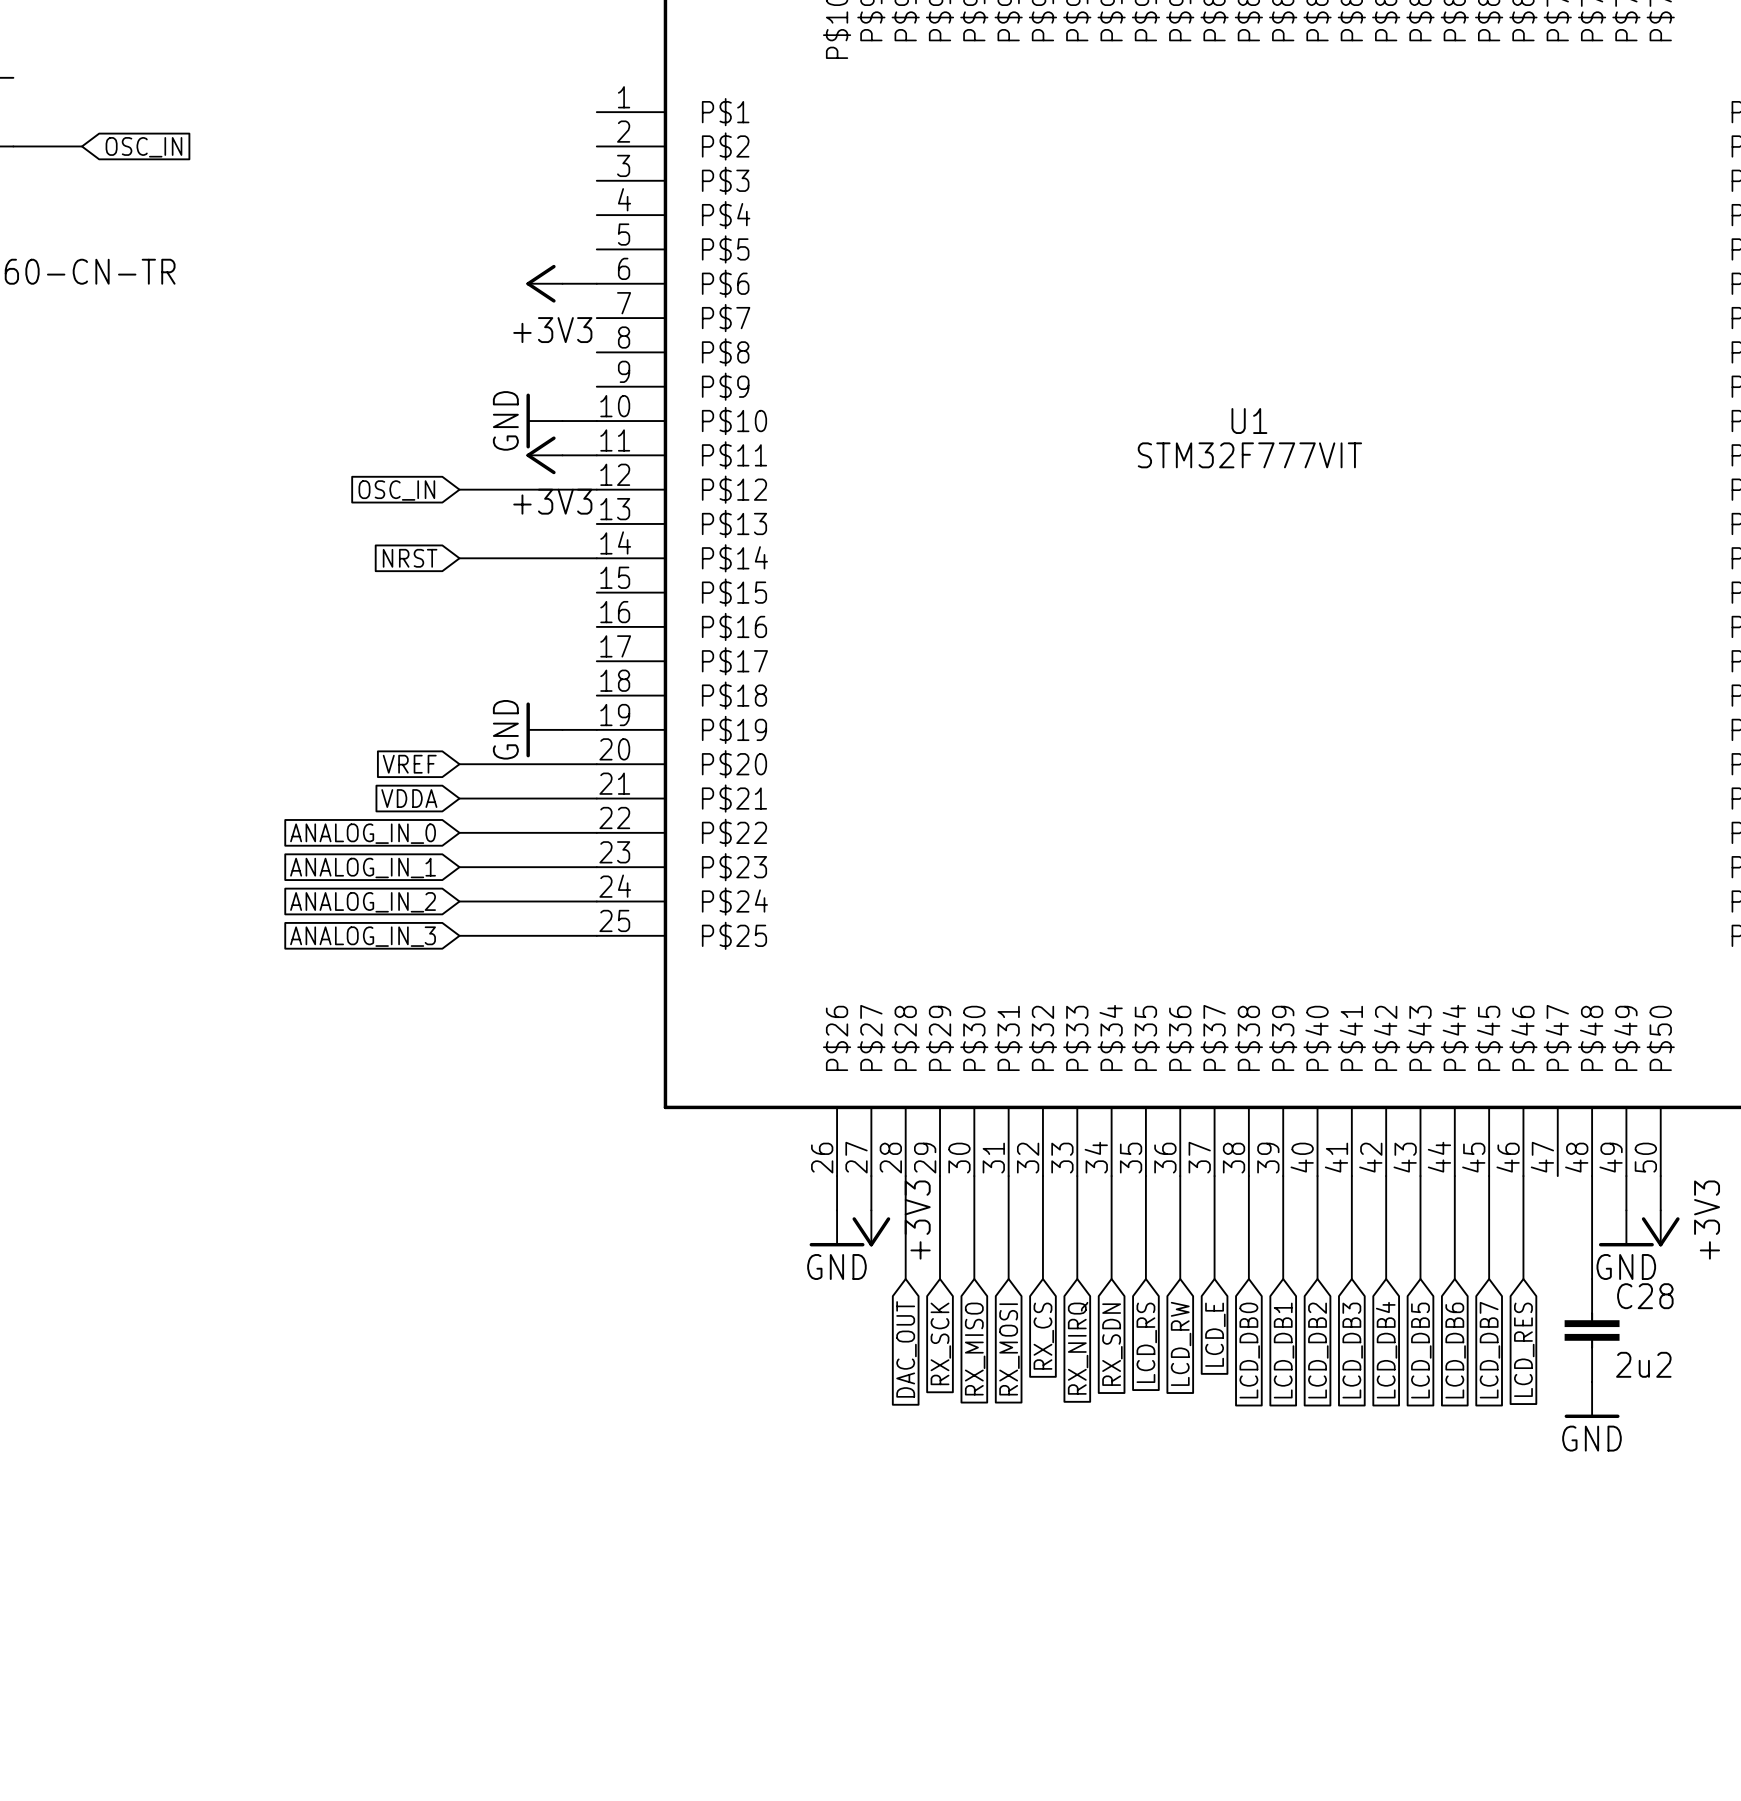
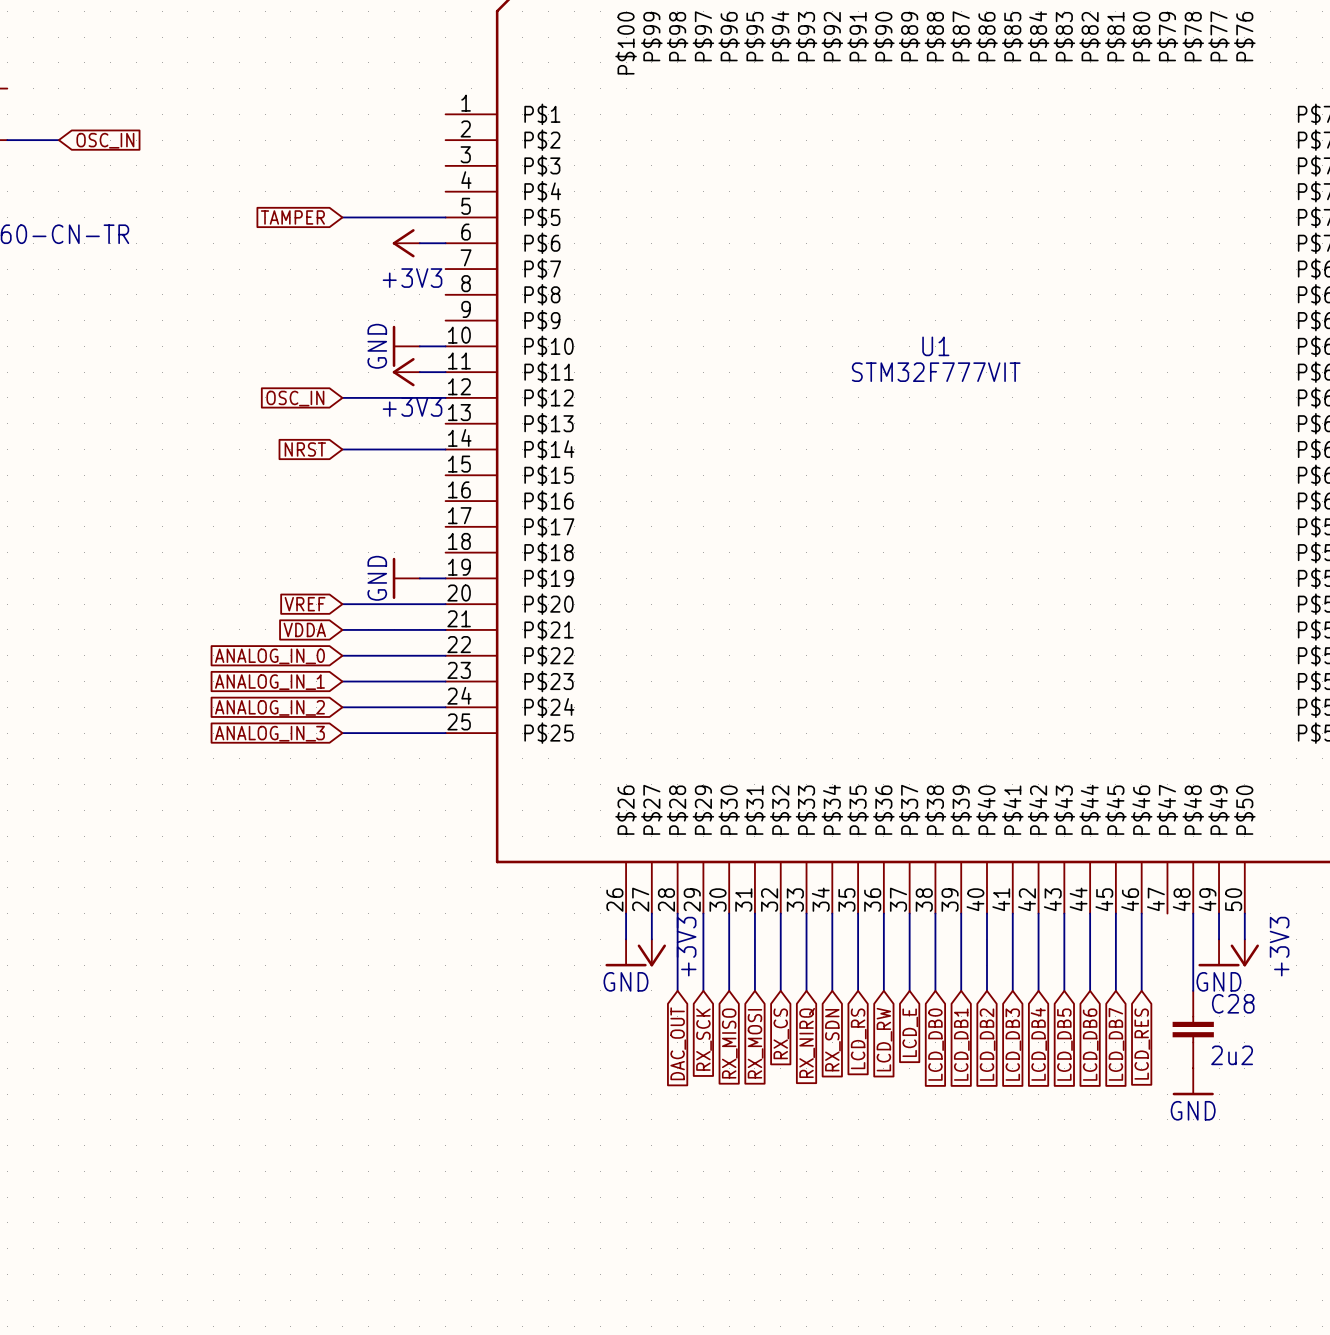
global label: none -> TAMPER (292, 217)
wire: none -> (342, 217) (445, 217)

